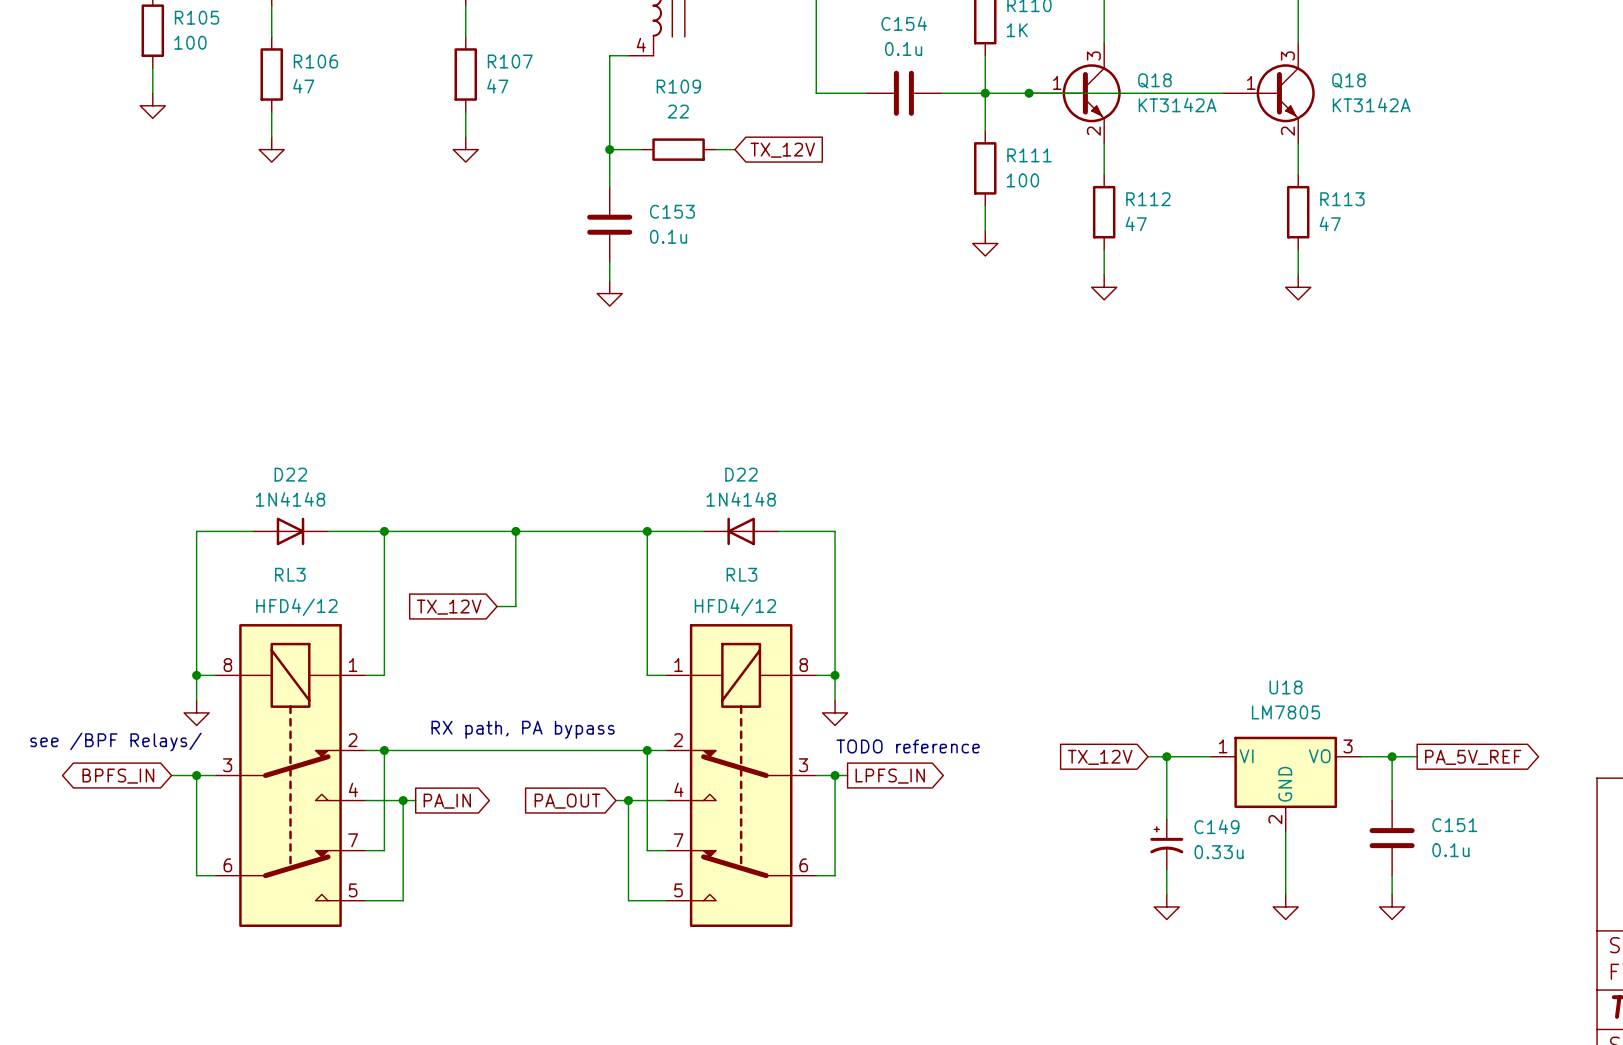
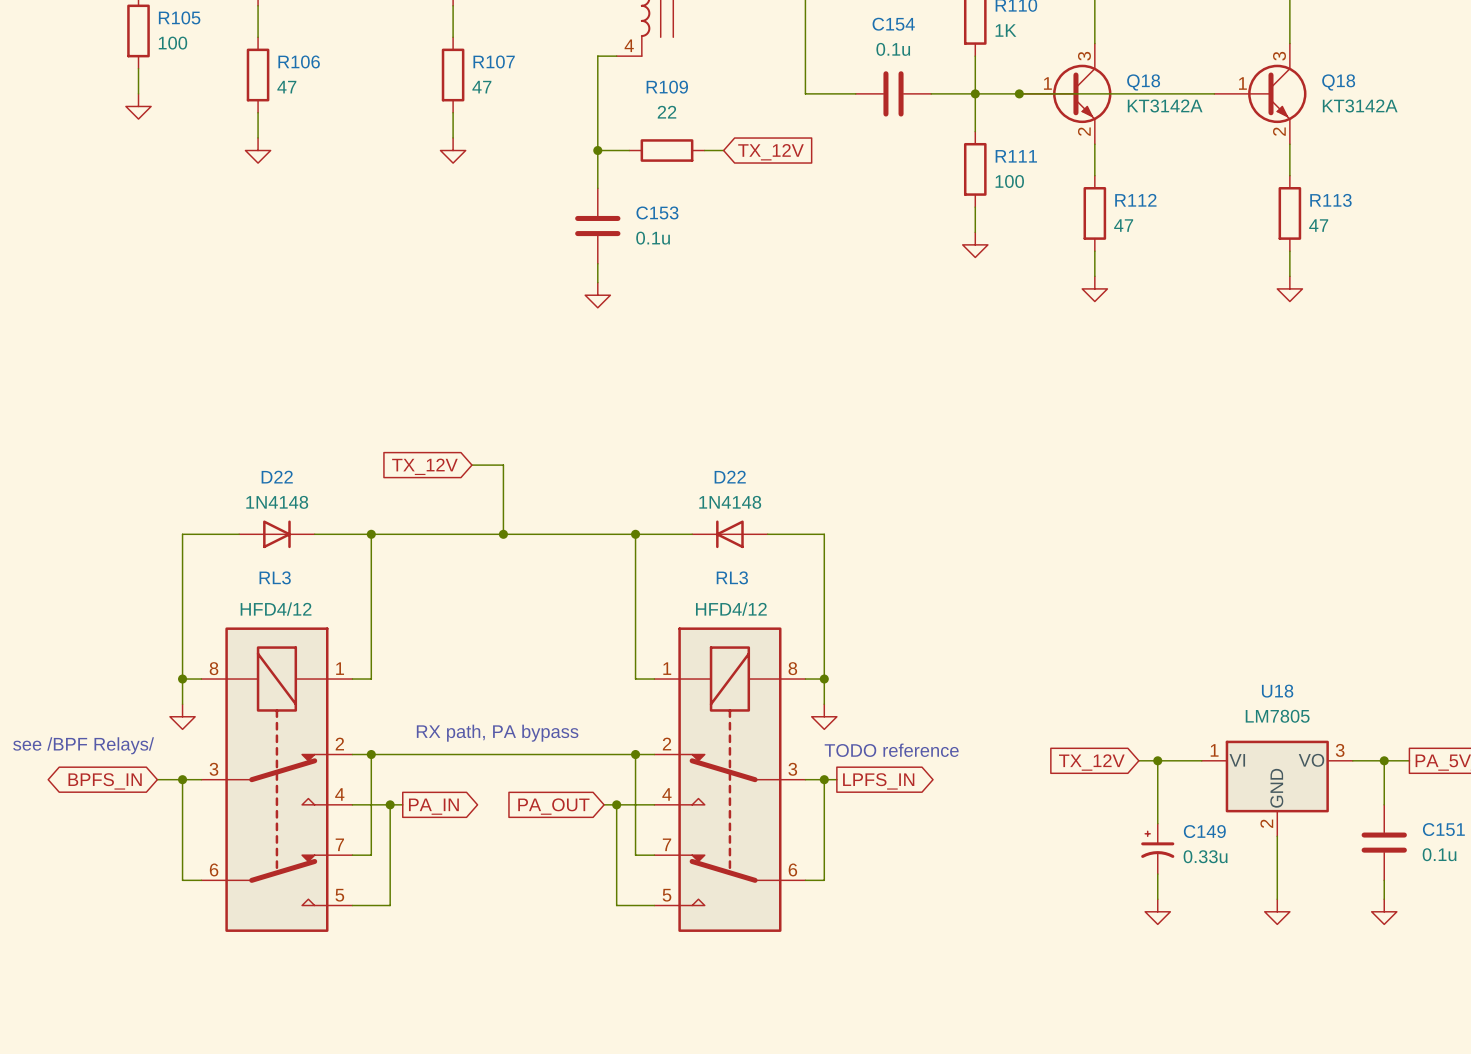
wire: (515, 531) (515, 606) (497, 606) -> (503, 534) (503, 465) (471, 465)
global label position: TX_12V (449, 607) -> TX_12V (424, 466)

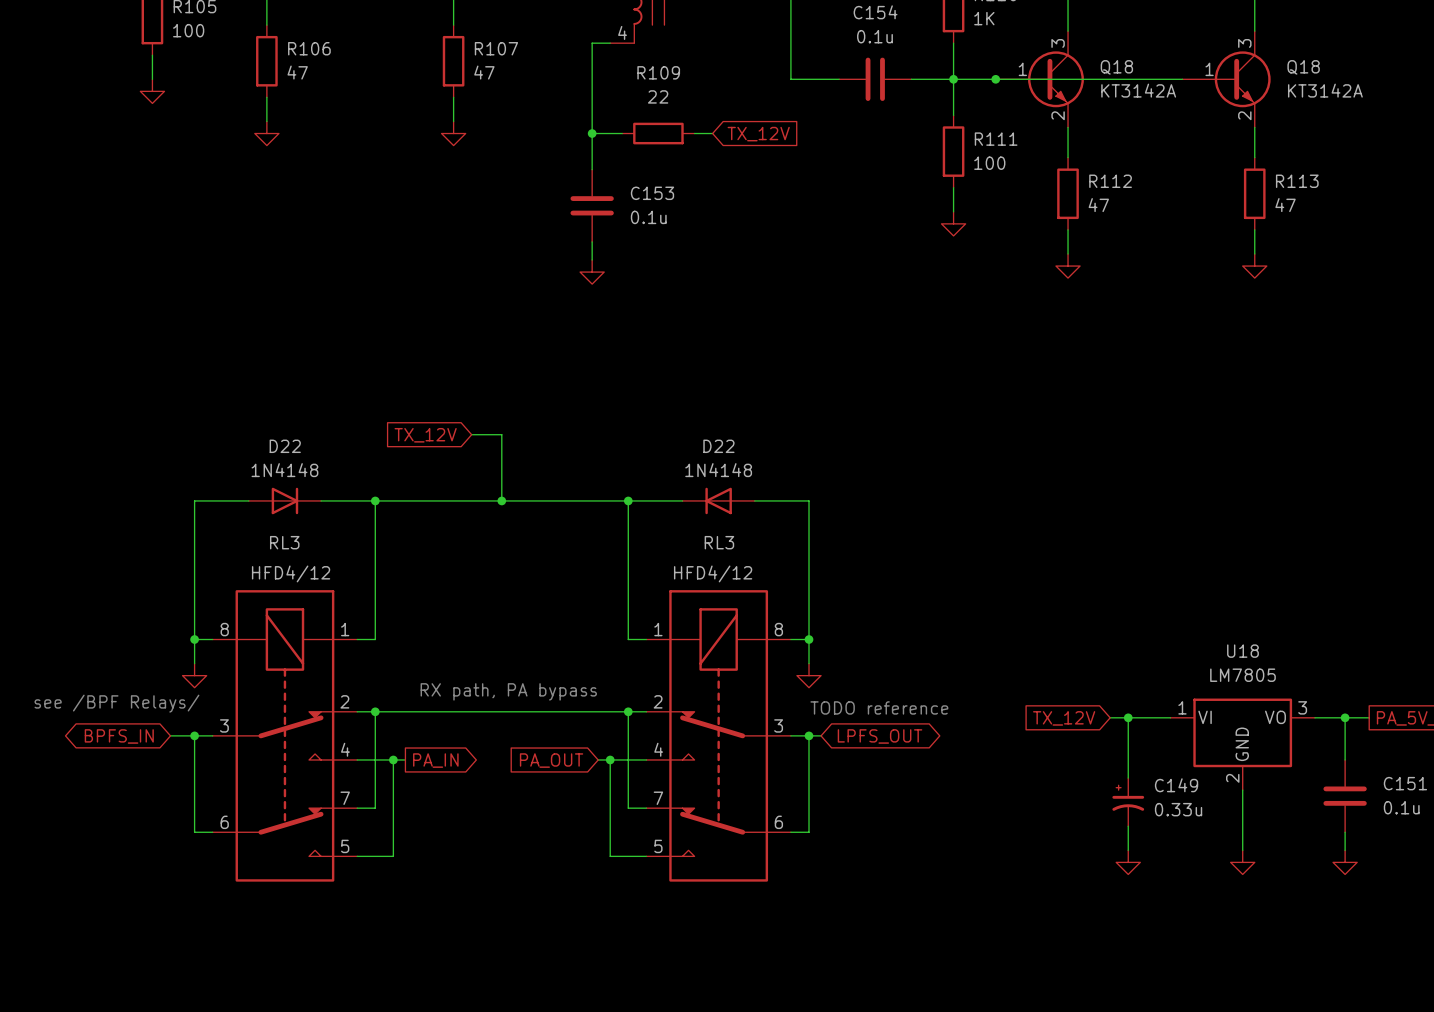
global label shape: output (878, 781) -> bidirectional (880, 736)
global label: LPFS_IN (878, 781) -> LPFS_OUT (880, 736)

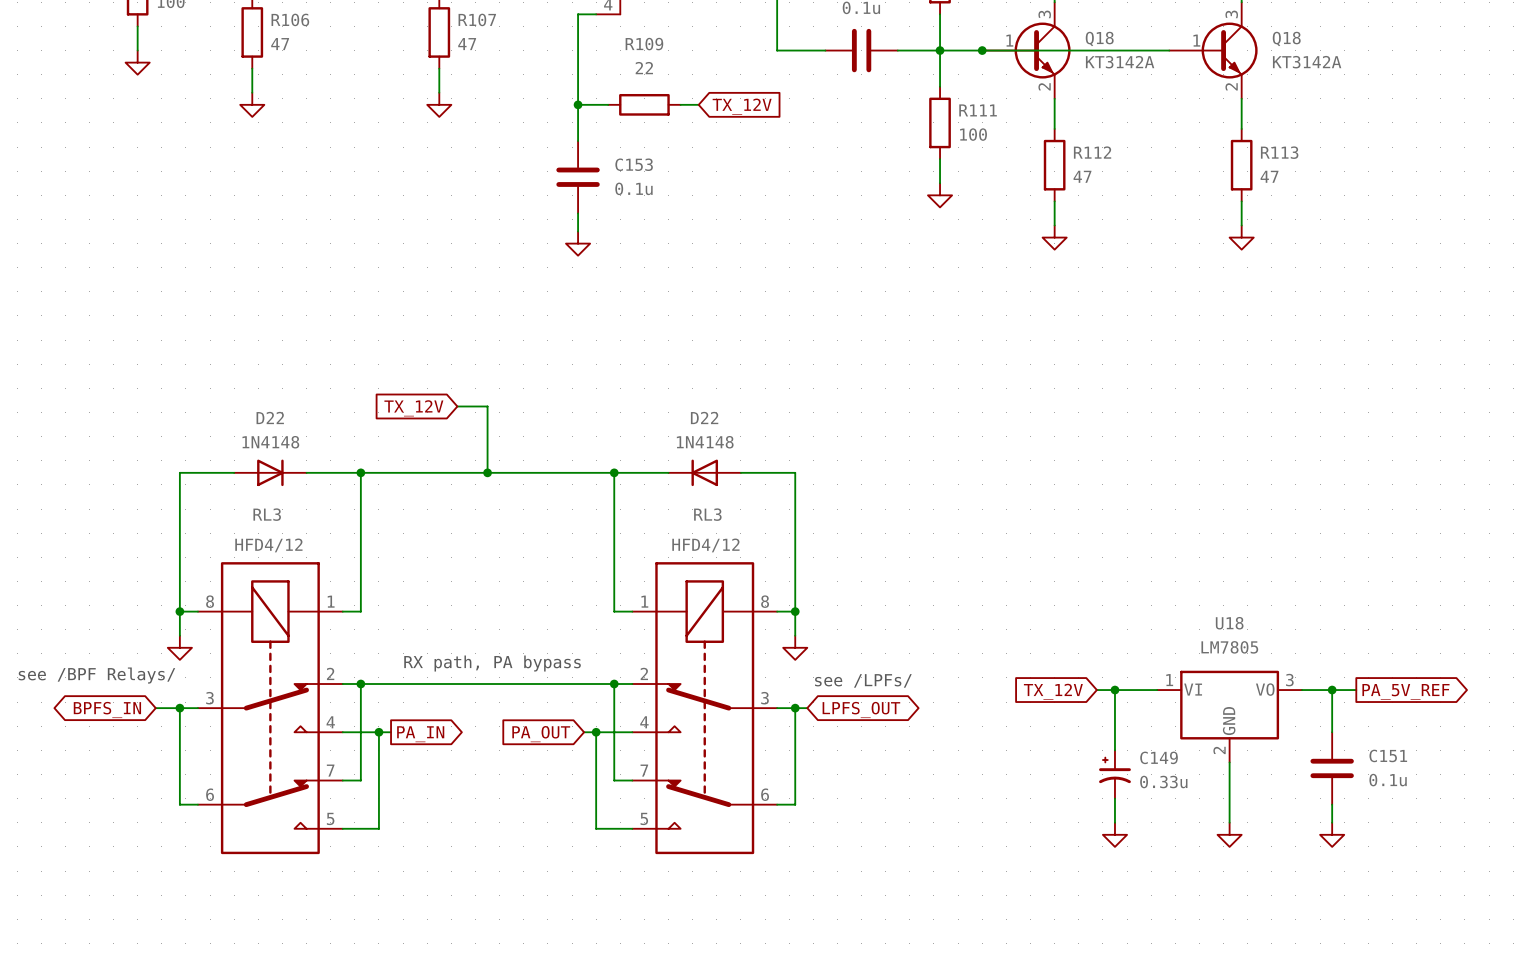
text: TODO reference (879, 707) -> none
text: none -> see /LPFs/ (863, 680)

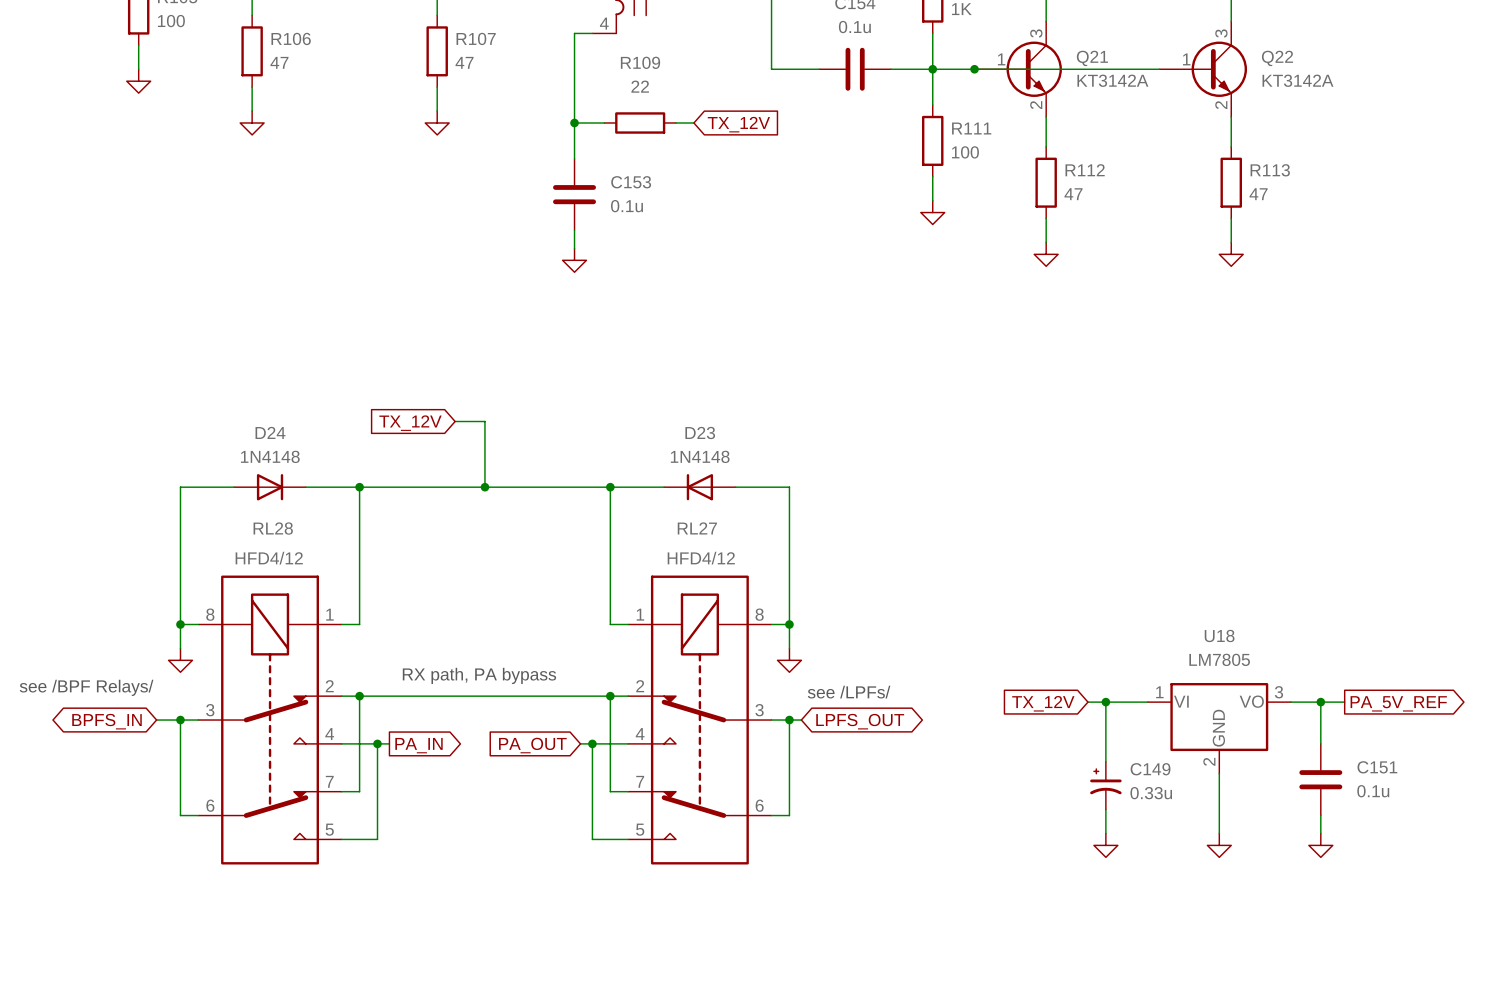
Q18 name: Q18 (1099, 39) -> Q21 (1092, 58)
Q18 name: Q18 (1286, 39) -> Q22 (1277, 58)
D22 name: D22 (270, 417) -> D24 (270, 432)
D22 name: D22 (704, 417) -> D23 (700, 433)
RL3 name: RL3 (267, 514) -> RL28 (273, 528)
RL3 name: RL3 (707, 514) -> RL27 (697, 528)

